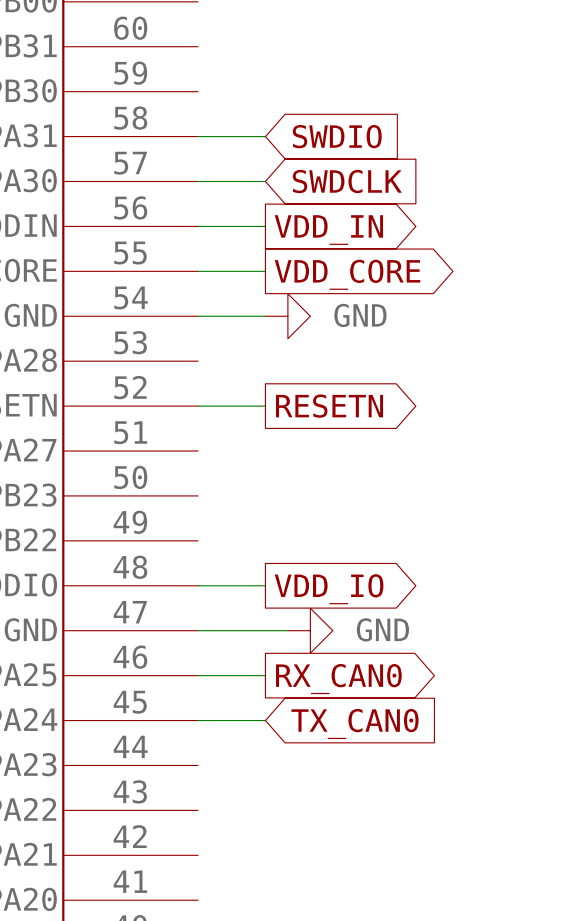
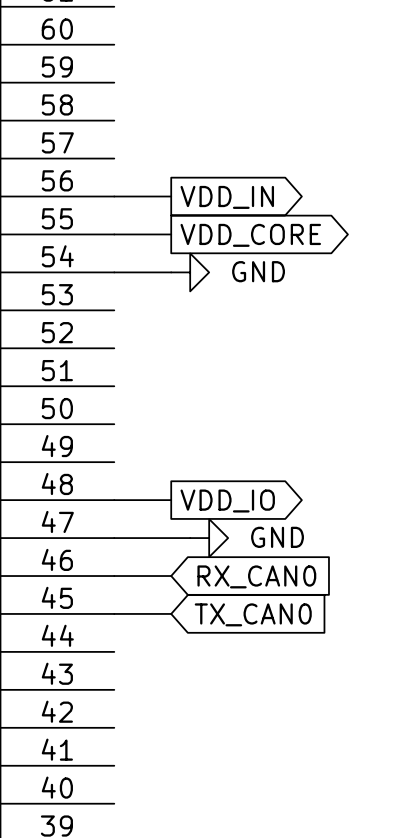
wire: (198, 136) (265, 136) -> none
global label: SWDIO (337, 136) -> none
wire: (198, 181) (265, 181) -> none
global label: SWDCLK (347, 181) -> none
wire: (198, 406) (265, 406) -> none
global label: RESETN (329, 406) -> none
global label shape: output (338, 679) -> input (256, 576)

